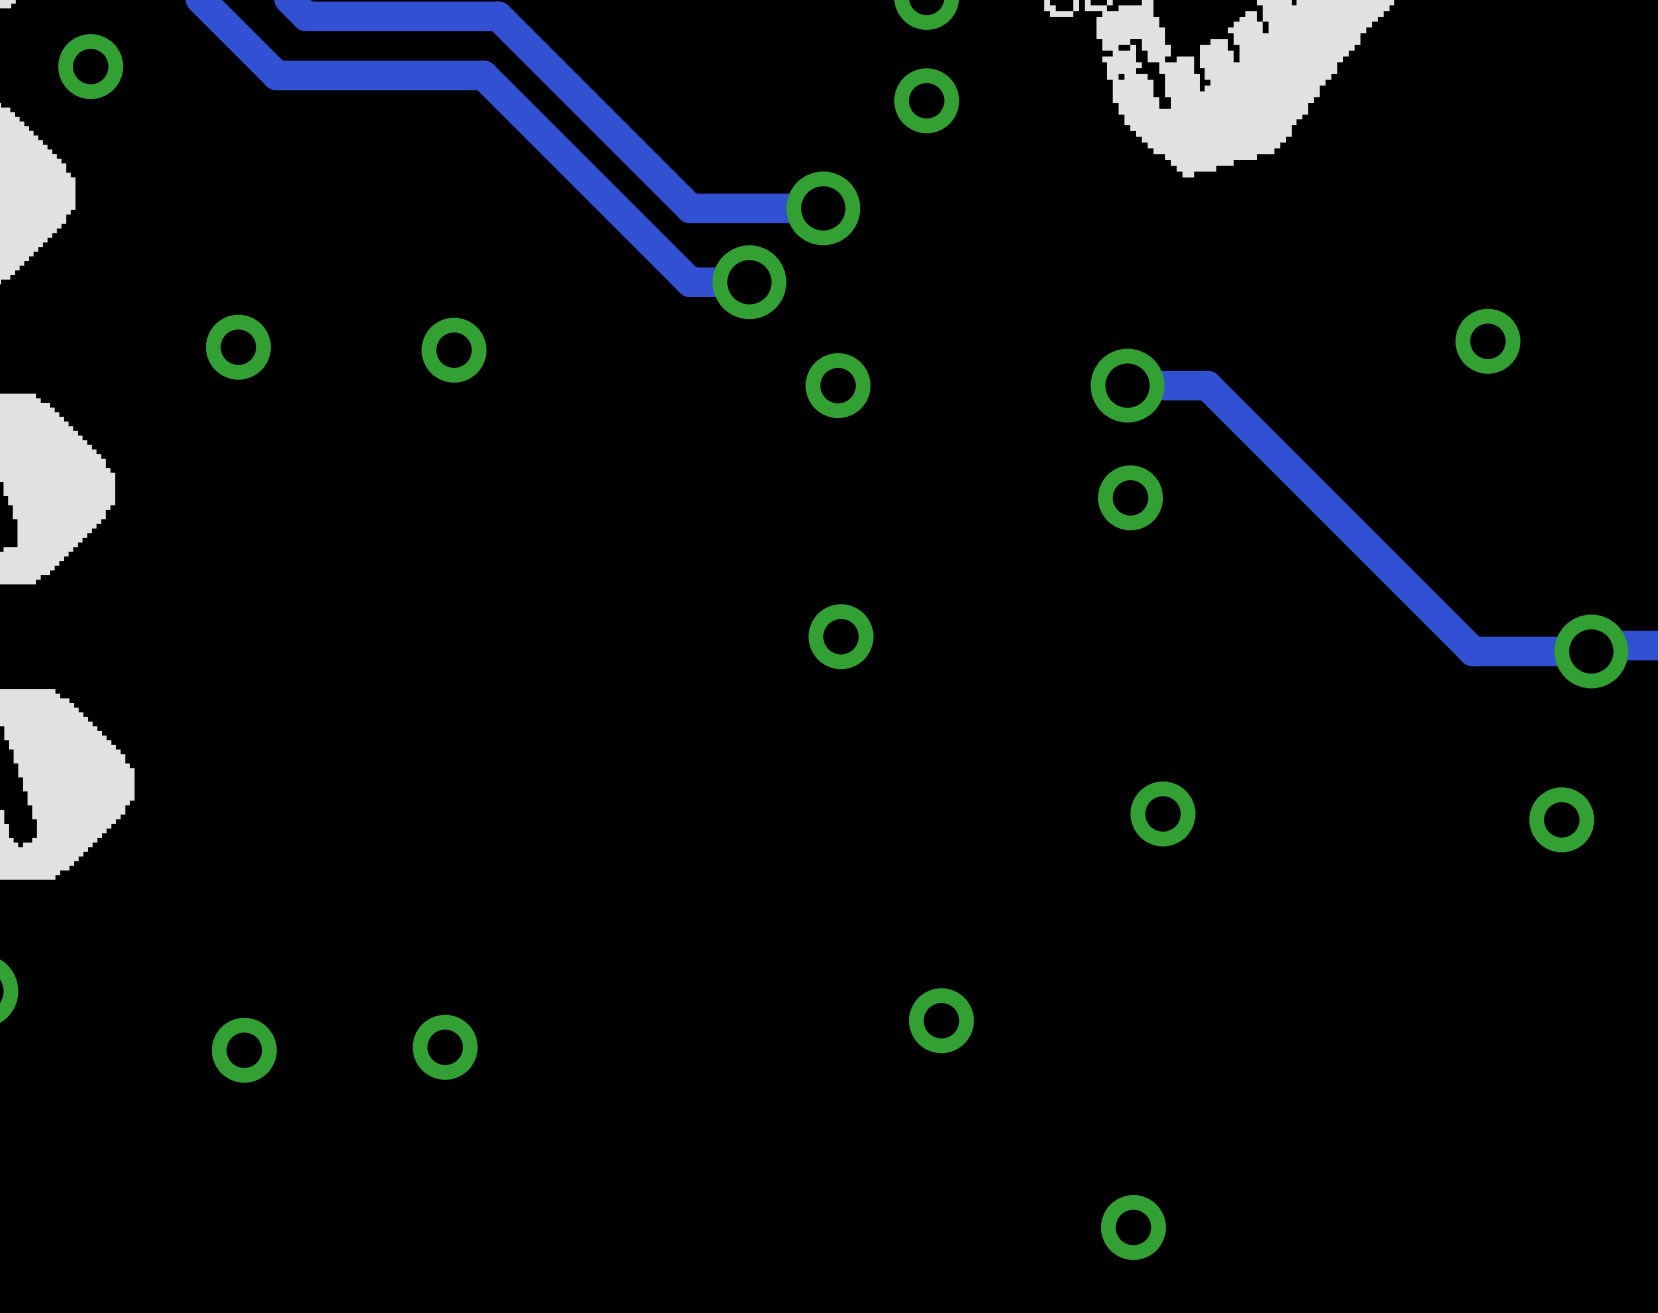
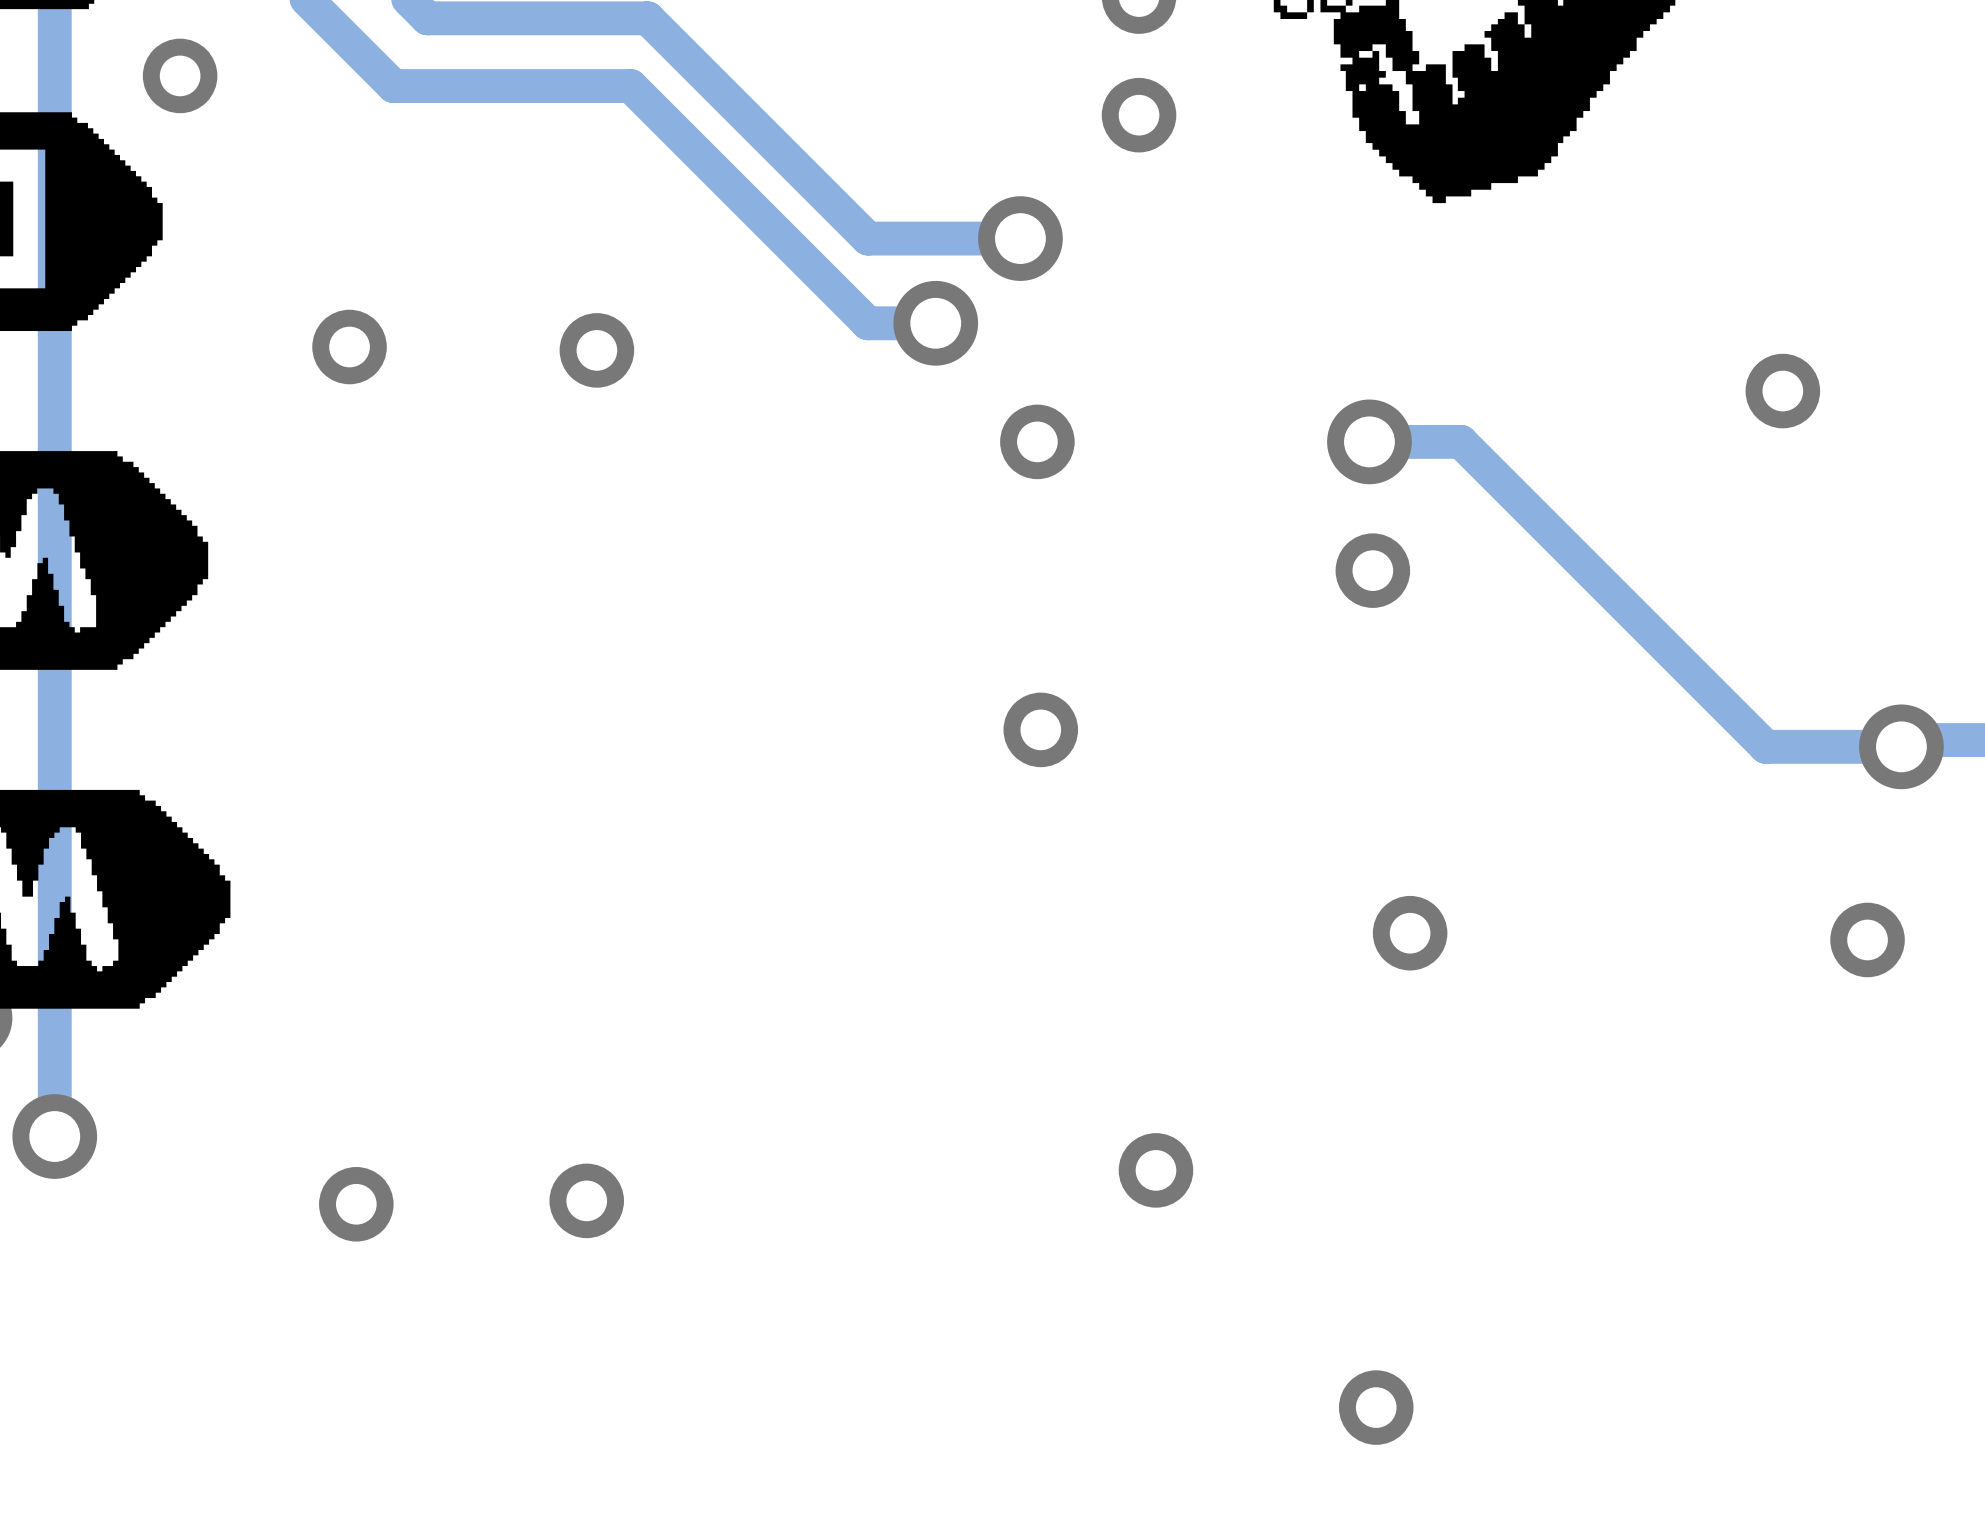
via position: (238, 347) -> (349, 347)
via position: (454, 350) -> (596, 350)

